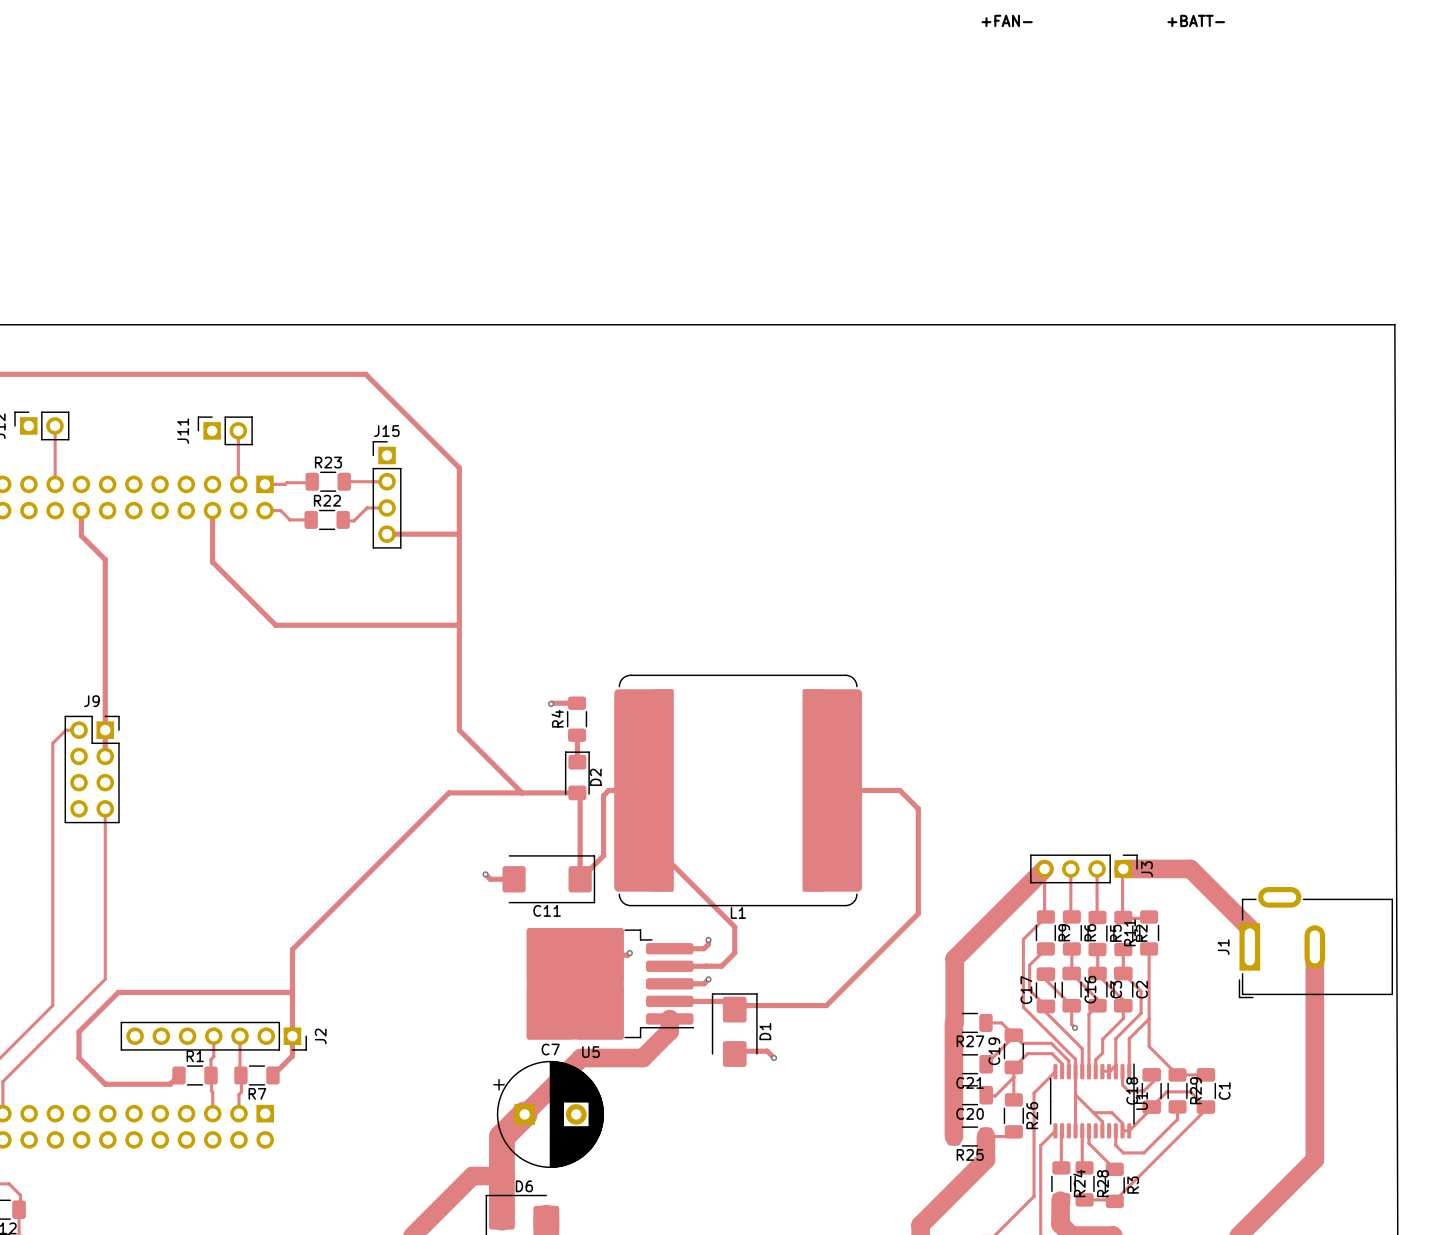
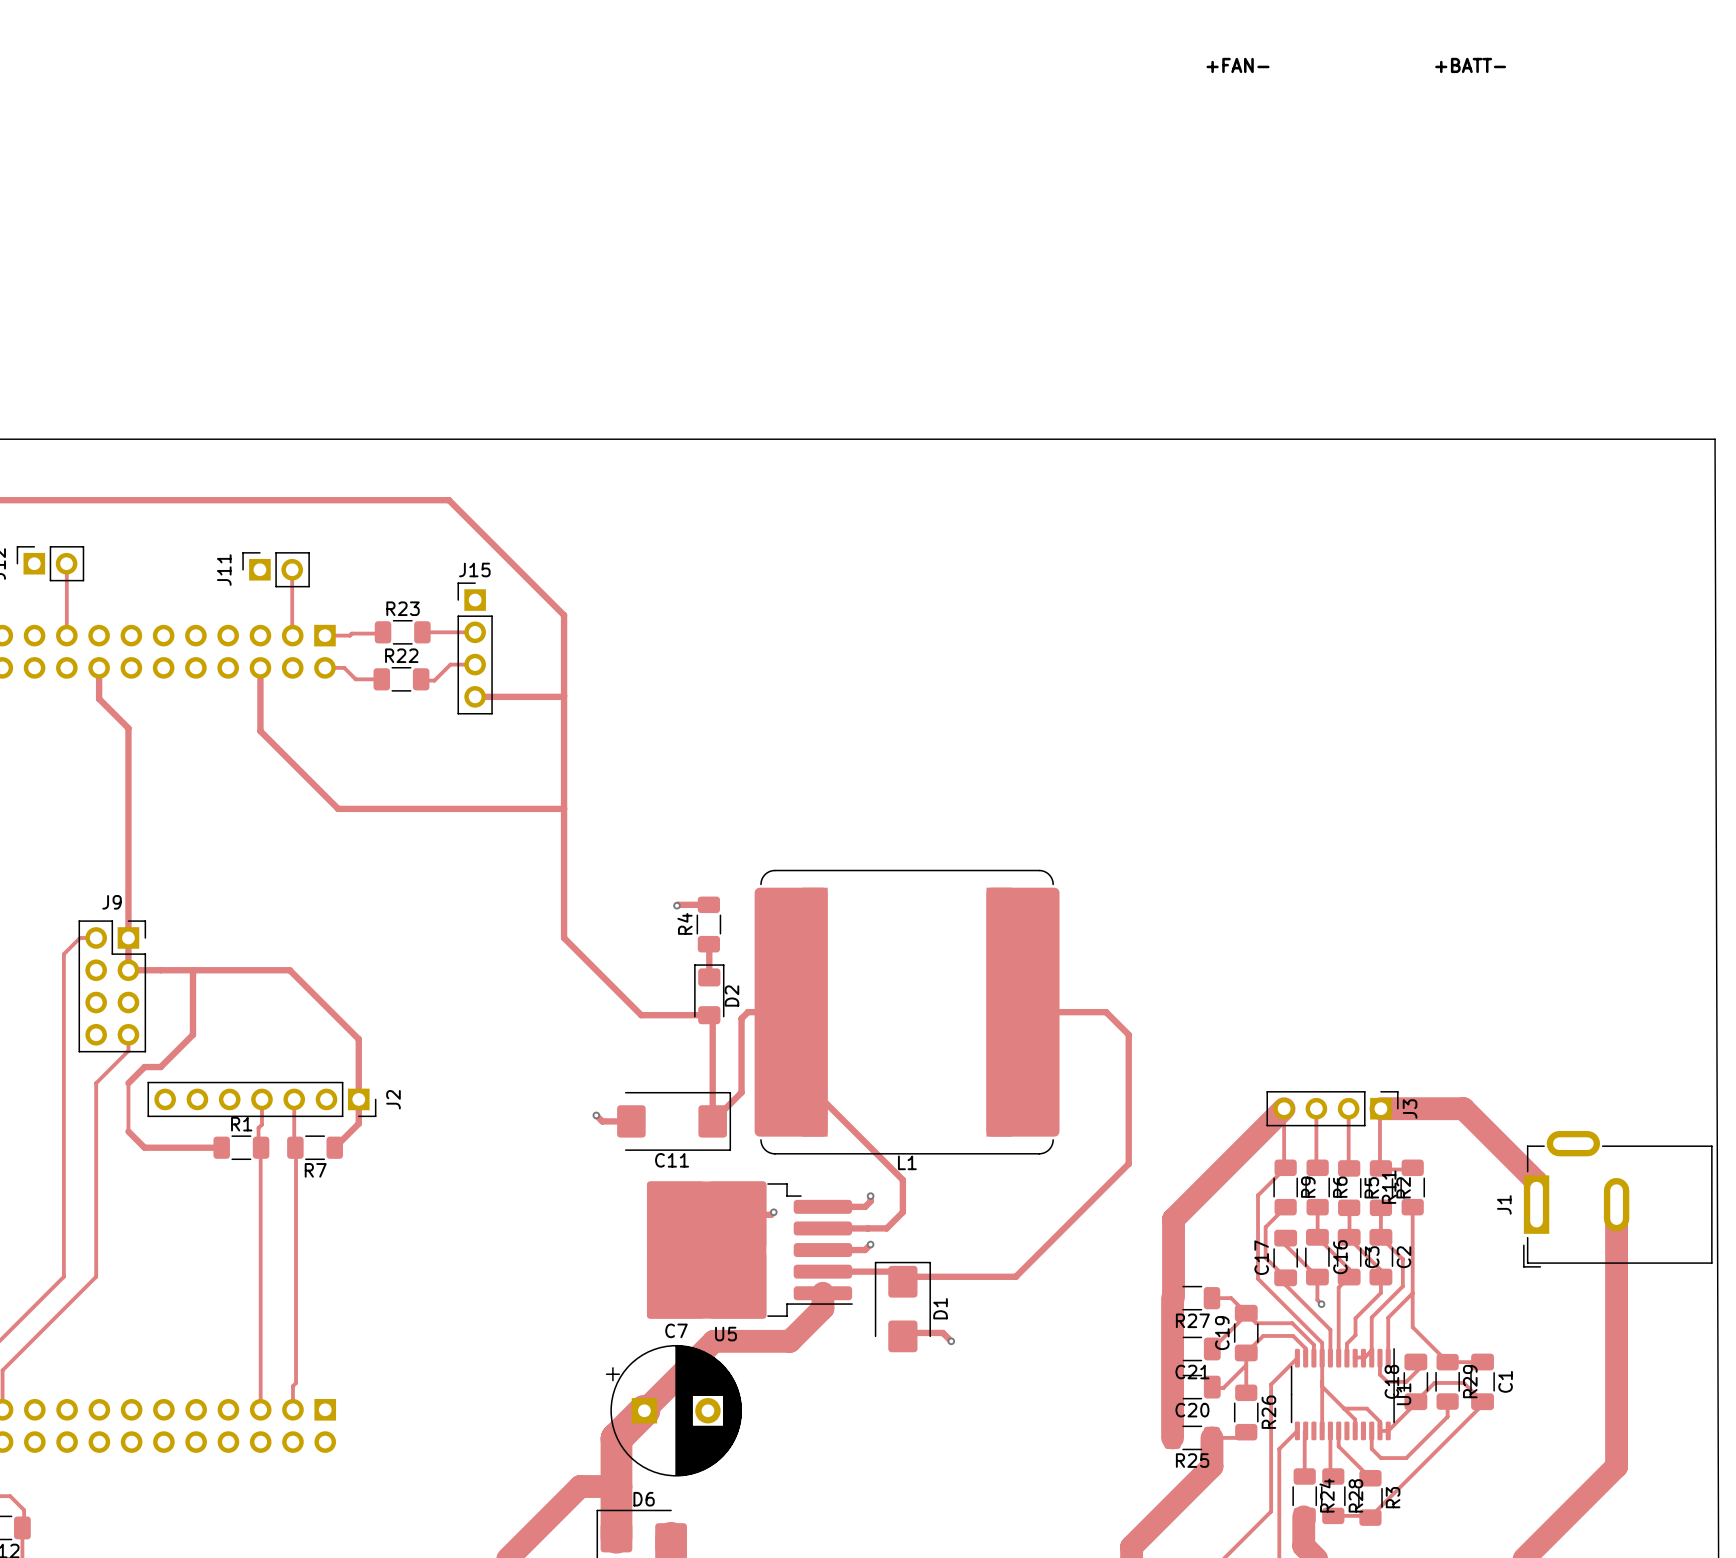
top track: none -> (128, 970) (289, 970) (358, 1039) (358, 1123) (334, 1147)
top track: (522, 792) (449, 792) (292, 949) (292, 1055) (272, 1075) -> none
top track: (105, 821) (105, 848) -> (192, 970) (192, 1034) (160, 1067) (144, 1067) (128, 1083)
top track: (105, 887) (105, 979) (79, 1005) -> (128, 1050) (96, 1083) (96, 1276)
top track: none -> (128, 1131) (144, 1147) (221, 1147)
top track: none -> (296, 1148) (296, 1363)
top track: (292, 992) (118, 992) (79, 1031) (79, 1058) (105, 1084) (170, 1084) (178, 1075) -> none
top track: (213, 1036) (210, 1075) -> (261, 1099) (261, 1124) (258, 1128) (258, 1147)
J2 position: (213, 1036) -> (261, 1099)
top track: (240, 1036) (240, 1074) -> (294, 1099) (294, 1146)
R1 position: (194, 1075) -> (241, 1147)
top track: (211, 1075) (212, 1092) -> (261, 1147) (260, 1383)
R7 position: (256, 1075) -> (315, 1147)

